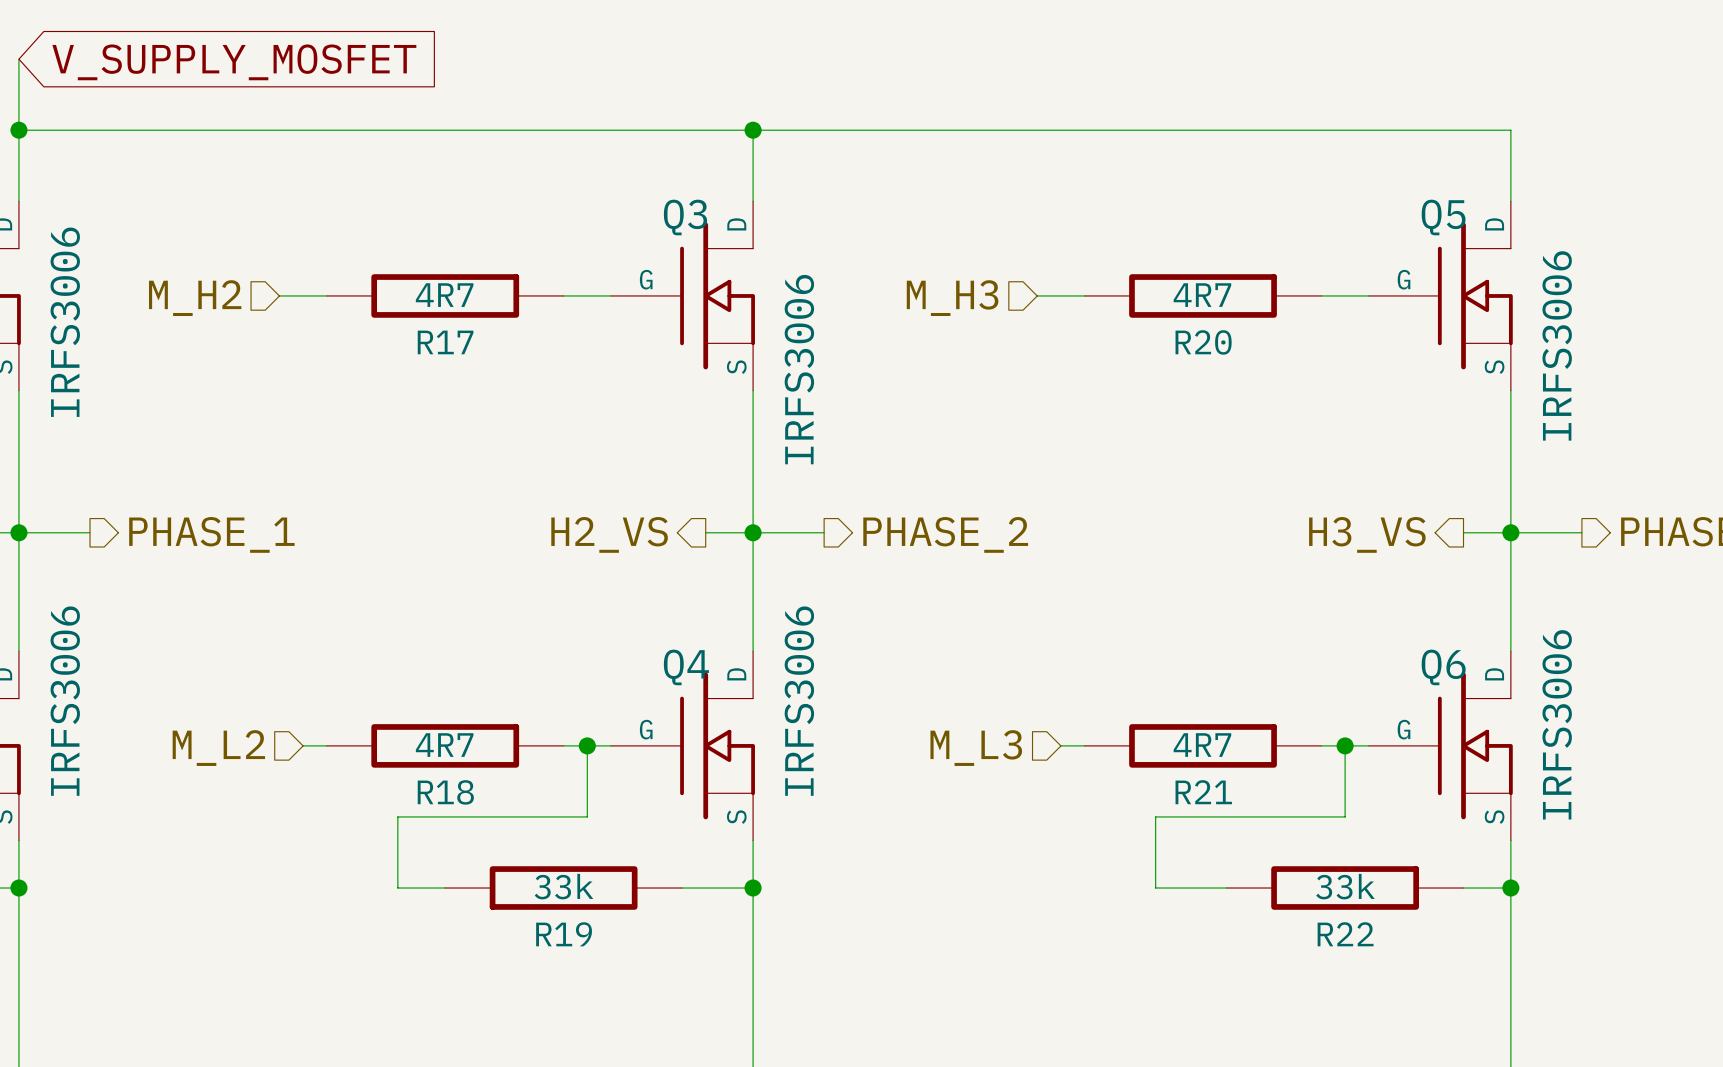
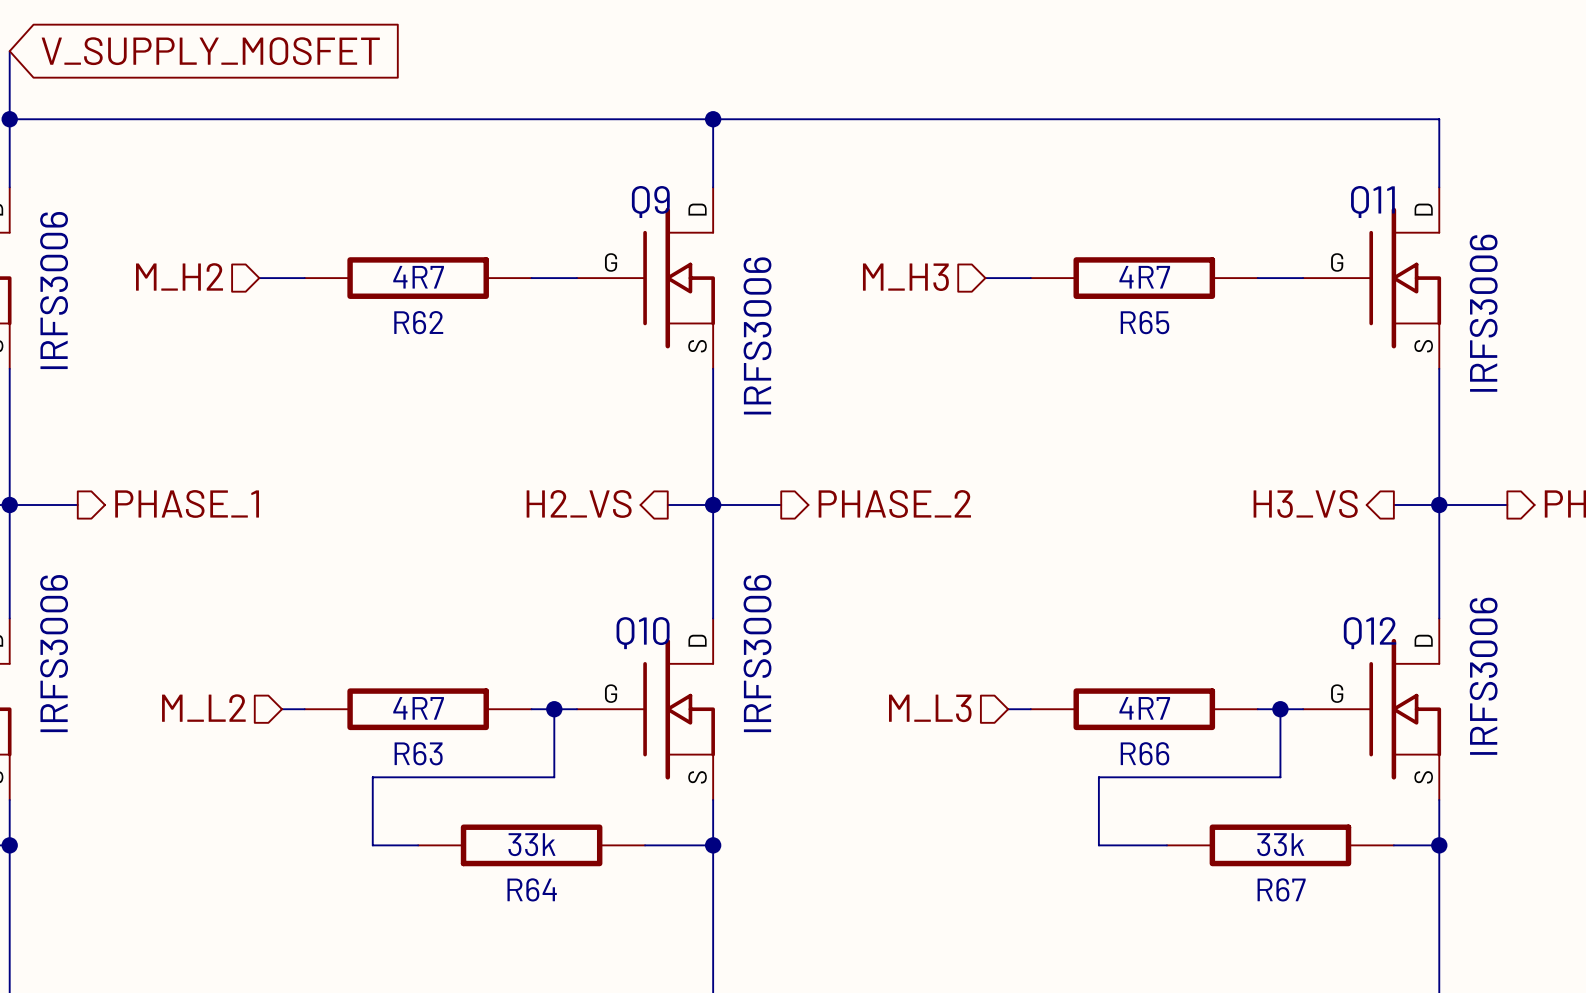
Q3 name: Q3 (685, 217) -> Q9 (650, 202)
Q5 name: Q5 (1443, 217) -> Q11 (1372, 202)
R17 name: R17 (445, 342) -> R62 (418, 322)
R20 name: R20 (1203, 342) -> R65 (1145, 322)
Q4 name: Q4 (686, 667) -> Q10 (643, 633)
Q6 name: Q6 (1443, 667) -> Q12 (1369, 633)
R18 name: R18 (445, 792) -> R63 (418, 753)
R21 name: R21 (1203, 792) -> R66 (1145, 753)
R19 name: R19 (564, 934) -> R64 (532, 889)
R22 name: R22 (1345, 934) -> R67 (1281, 889)

